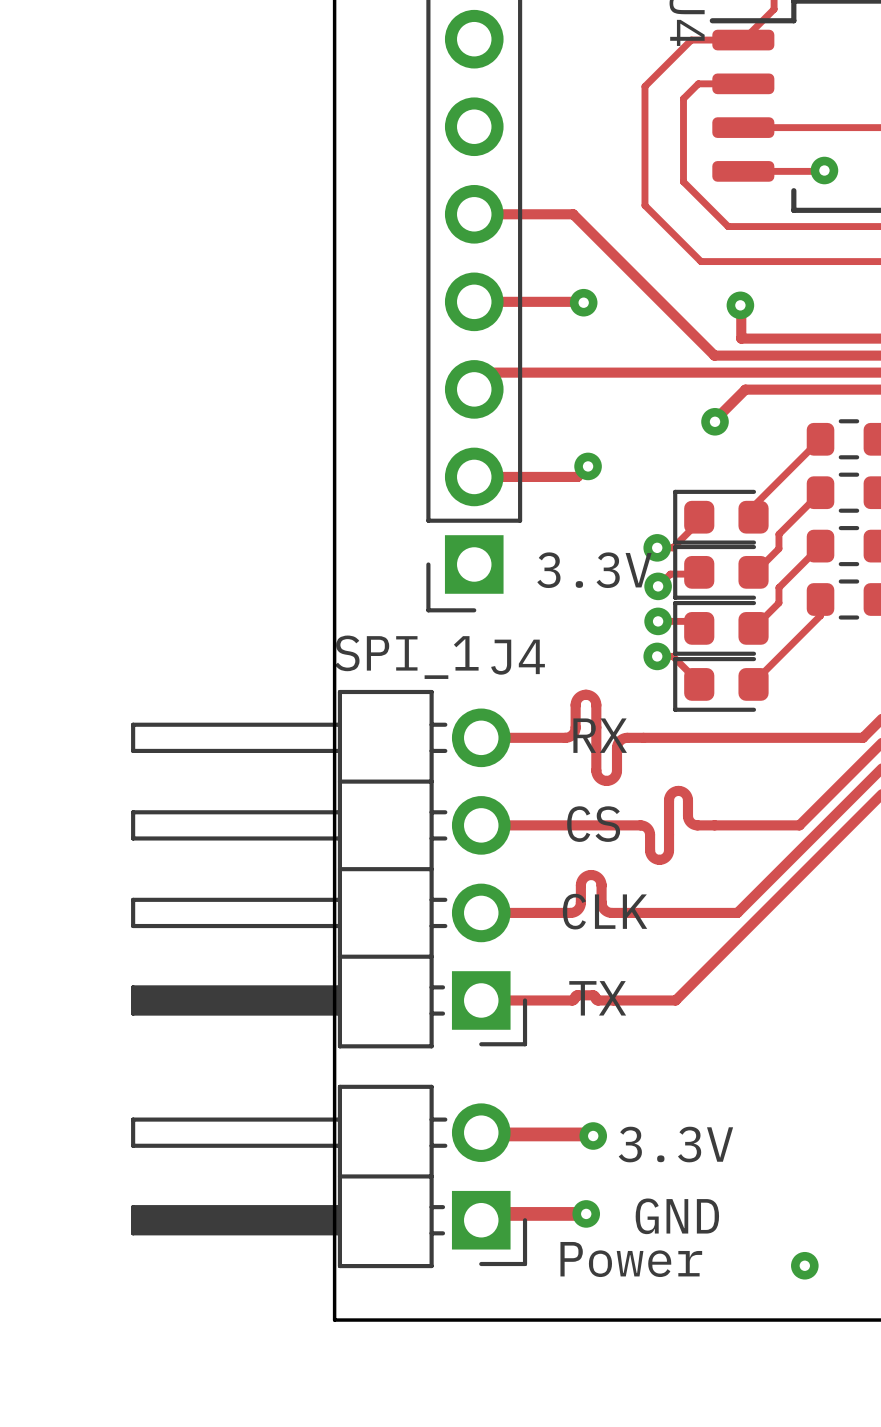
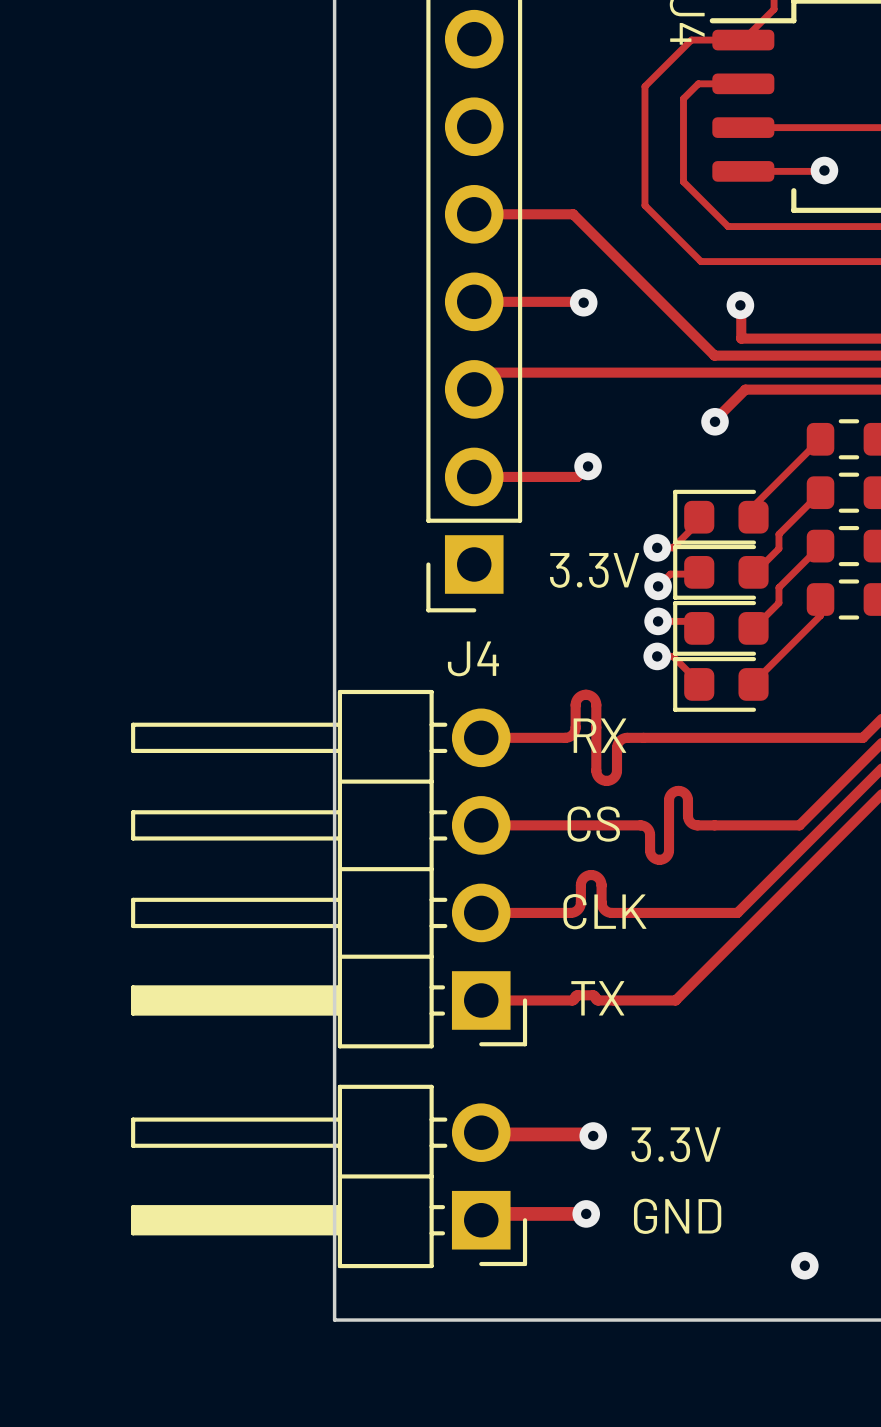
part value: SPI_1 (406, 657) -> none
J4 name position: J4 (518, 657) -> J4 (473, 658)
part value: Power (631, 1259) -> none

